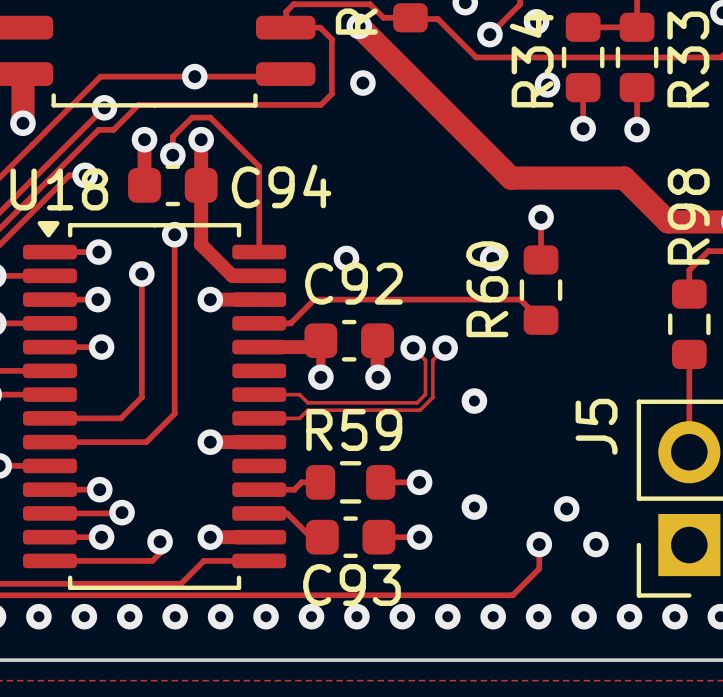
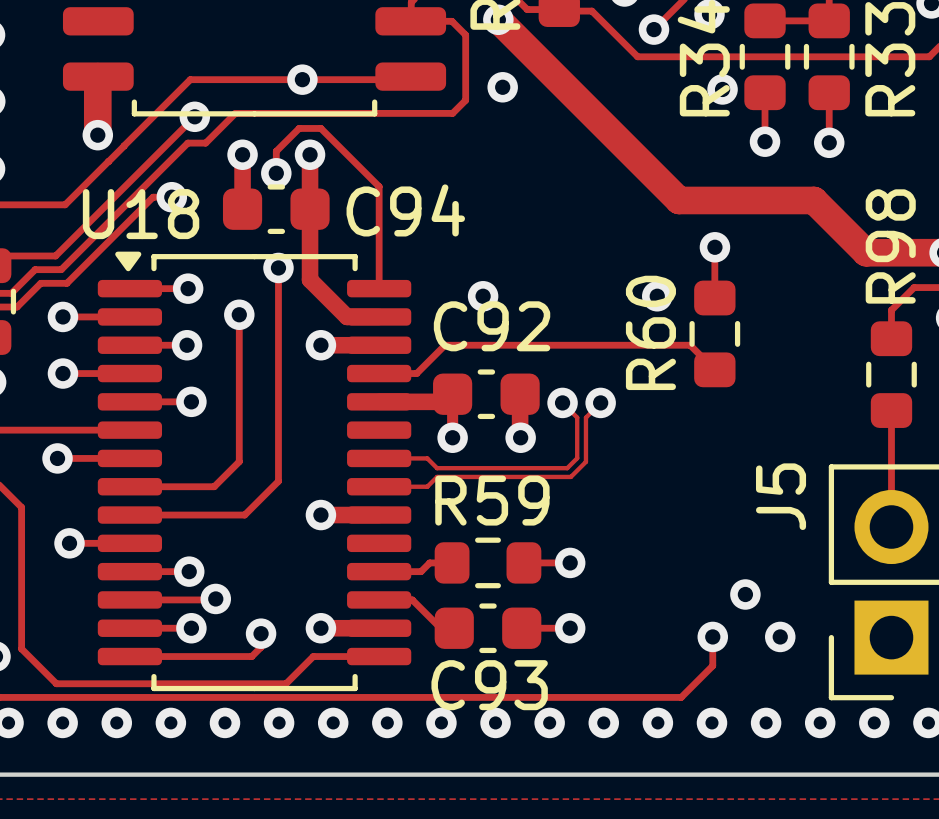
via: (474, 401) -> none
via: (474, 507) -> none

